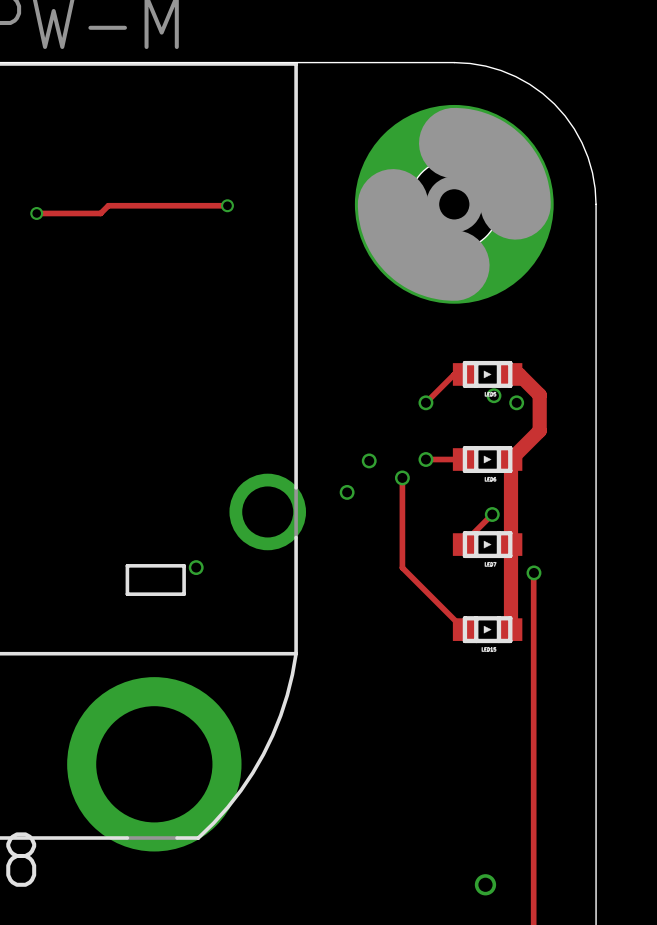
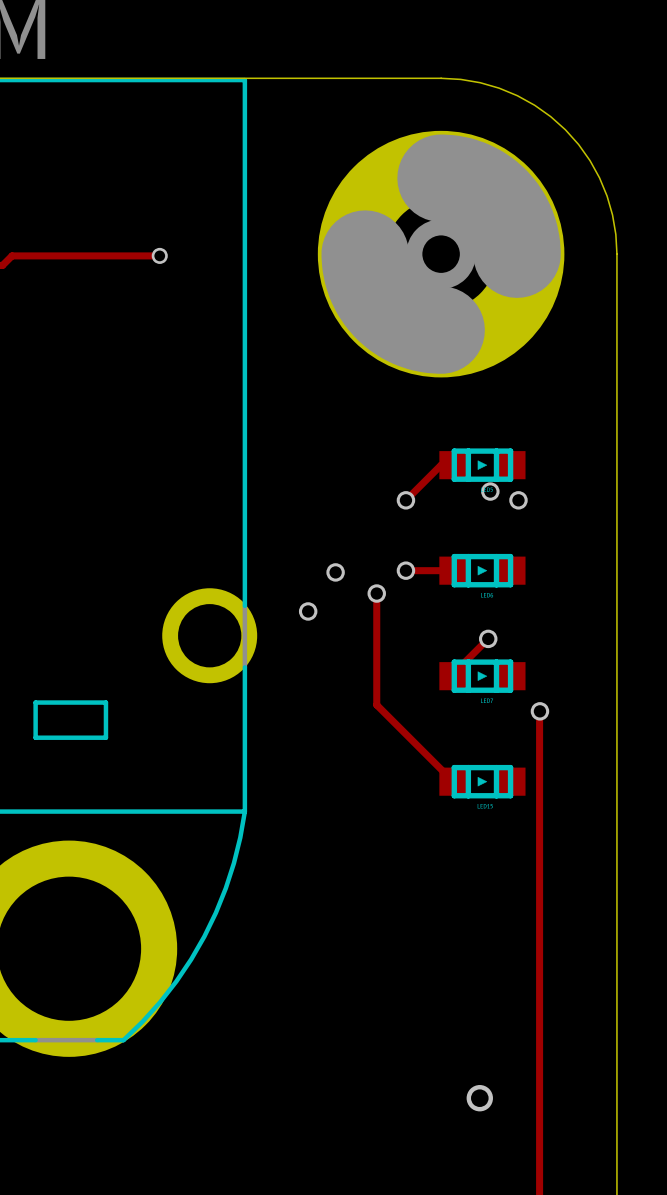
track: (510, 374) (519, 374) (539, 395) (539, 430) (510, 459) (510, 629) -> none
via: (196, 567) -> none

